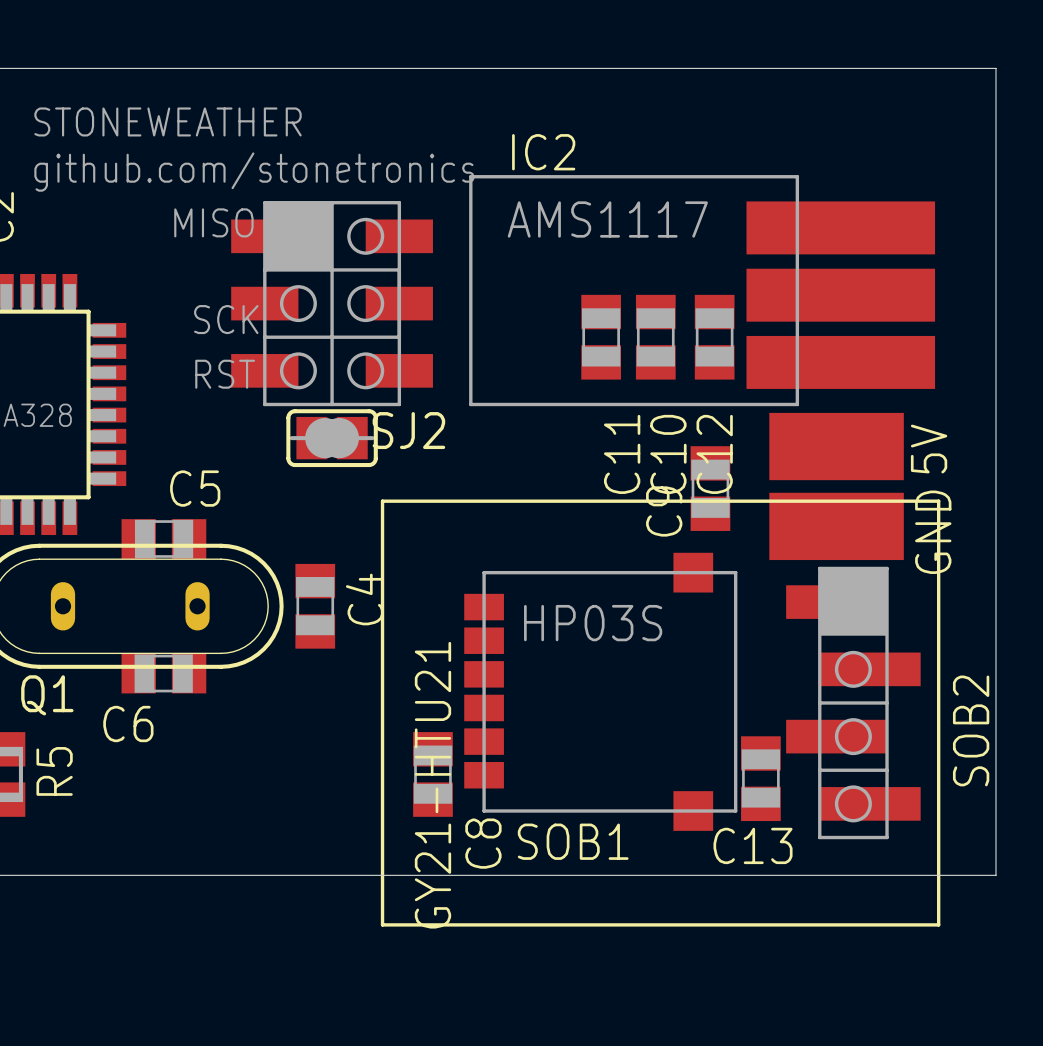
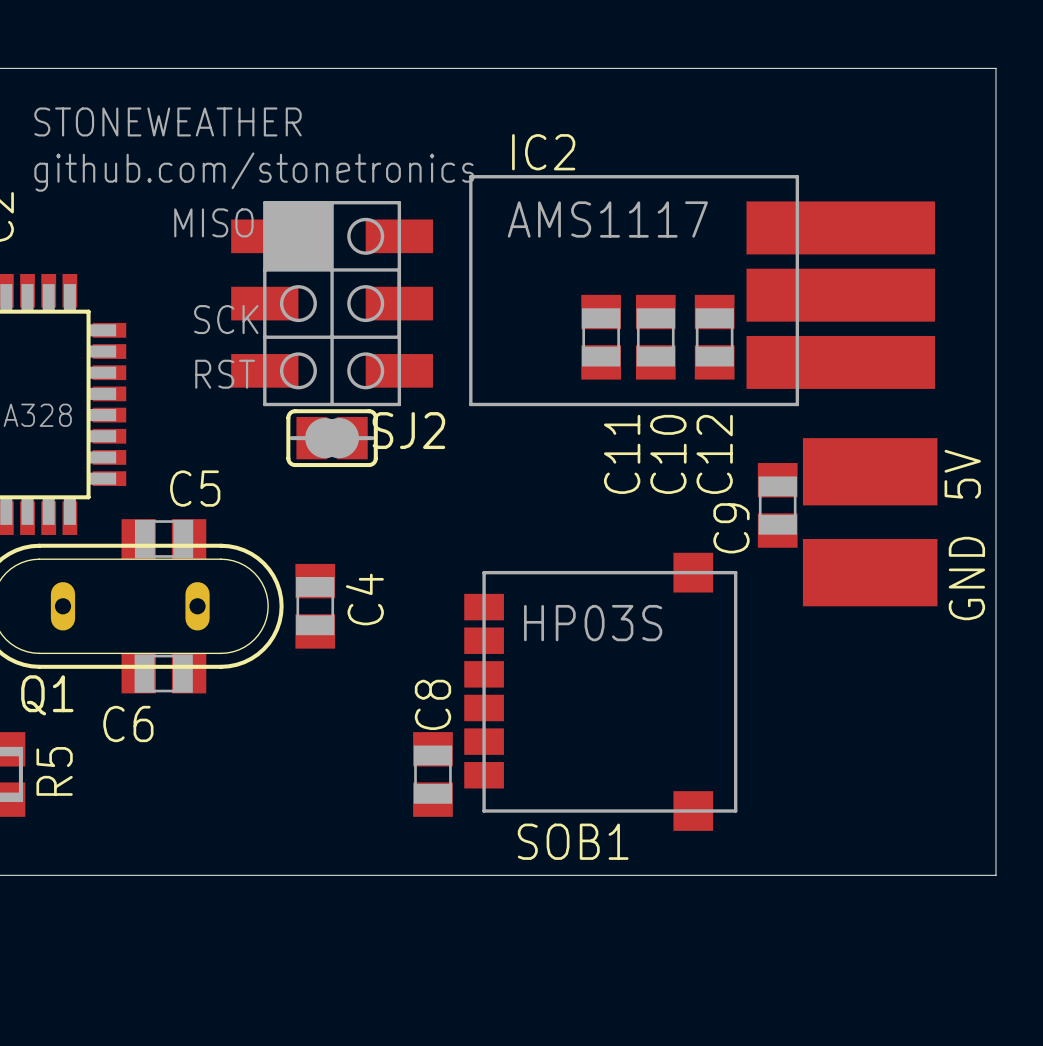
5V position: (836, 446) -> (870, 471)
C9 position: (710, 488) -> (777, 505)
GND position: (836, 526) -> (870, 572)
SOB2: (660, 713) -> none
C13: (760, 778) -> none
C8 name position: C8 (483, 843) -> C8 (432, 704)

